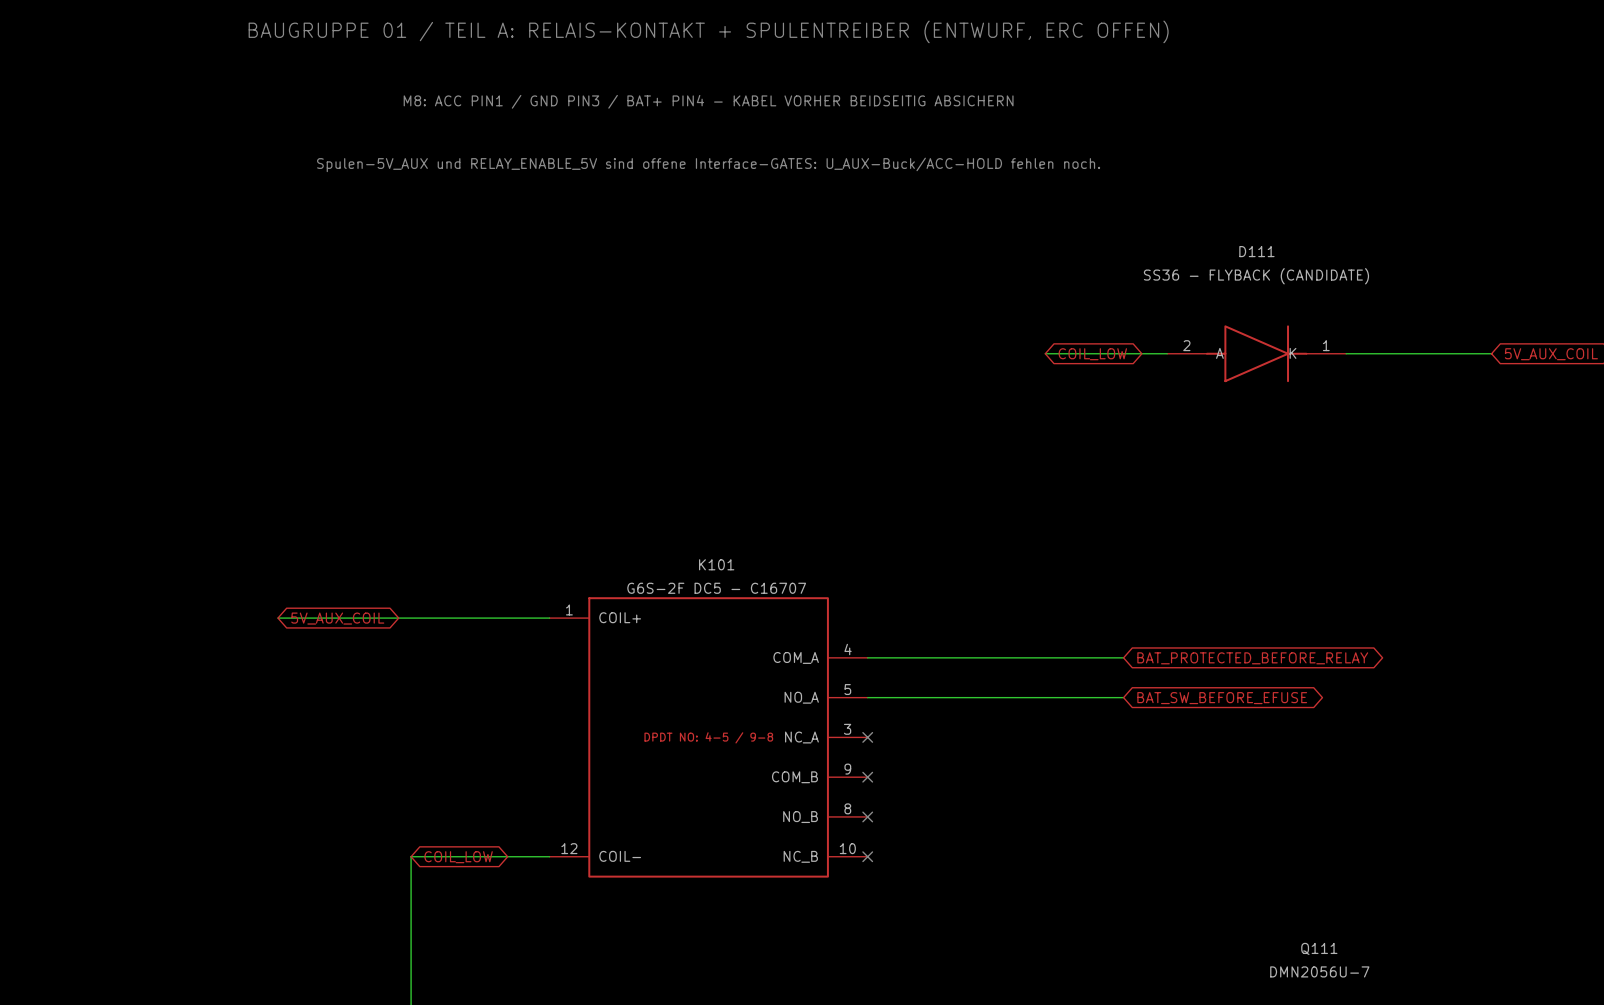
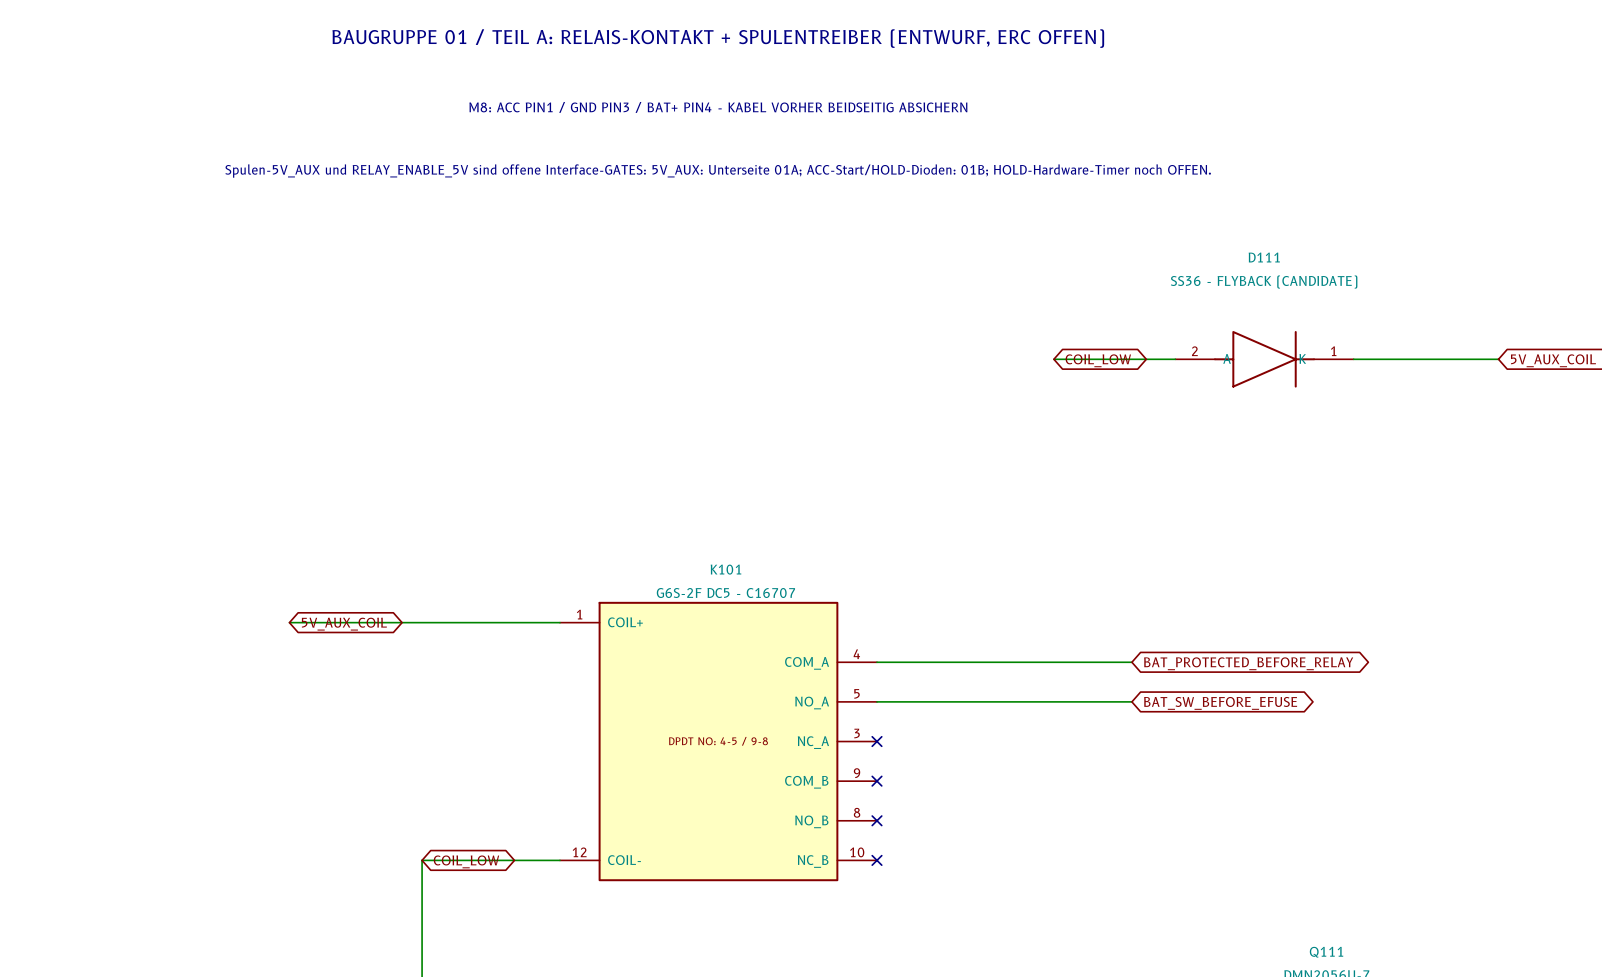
text: Spulen-5V_AUX und RELAY_ENABLE_5V sind offene Interface-GATES: U_AUX-Buck/ACC-HOLD fehlen noch. (708, 164) -> Spulen-5V_AUX und RELAY_ENABLE_5V sind offene Interface-GATES: 5V_AUX: Unterseite 01A; ACC-Start/HOLD-Dioden: 01B; HOLD-Hardware-Timer noch OFFEN. (718, 171)

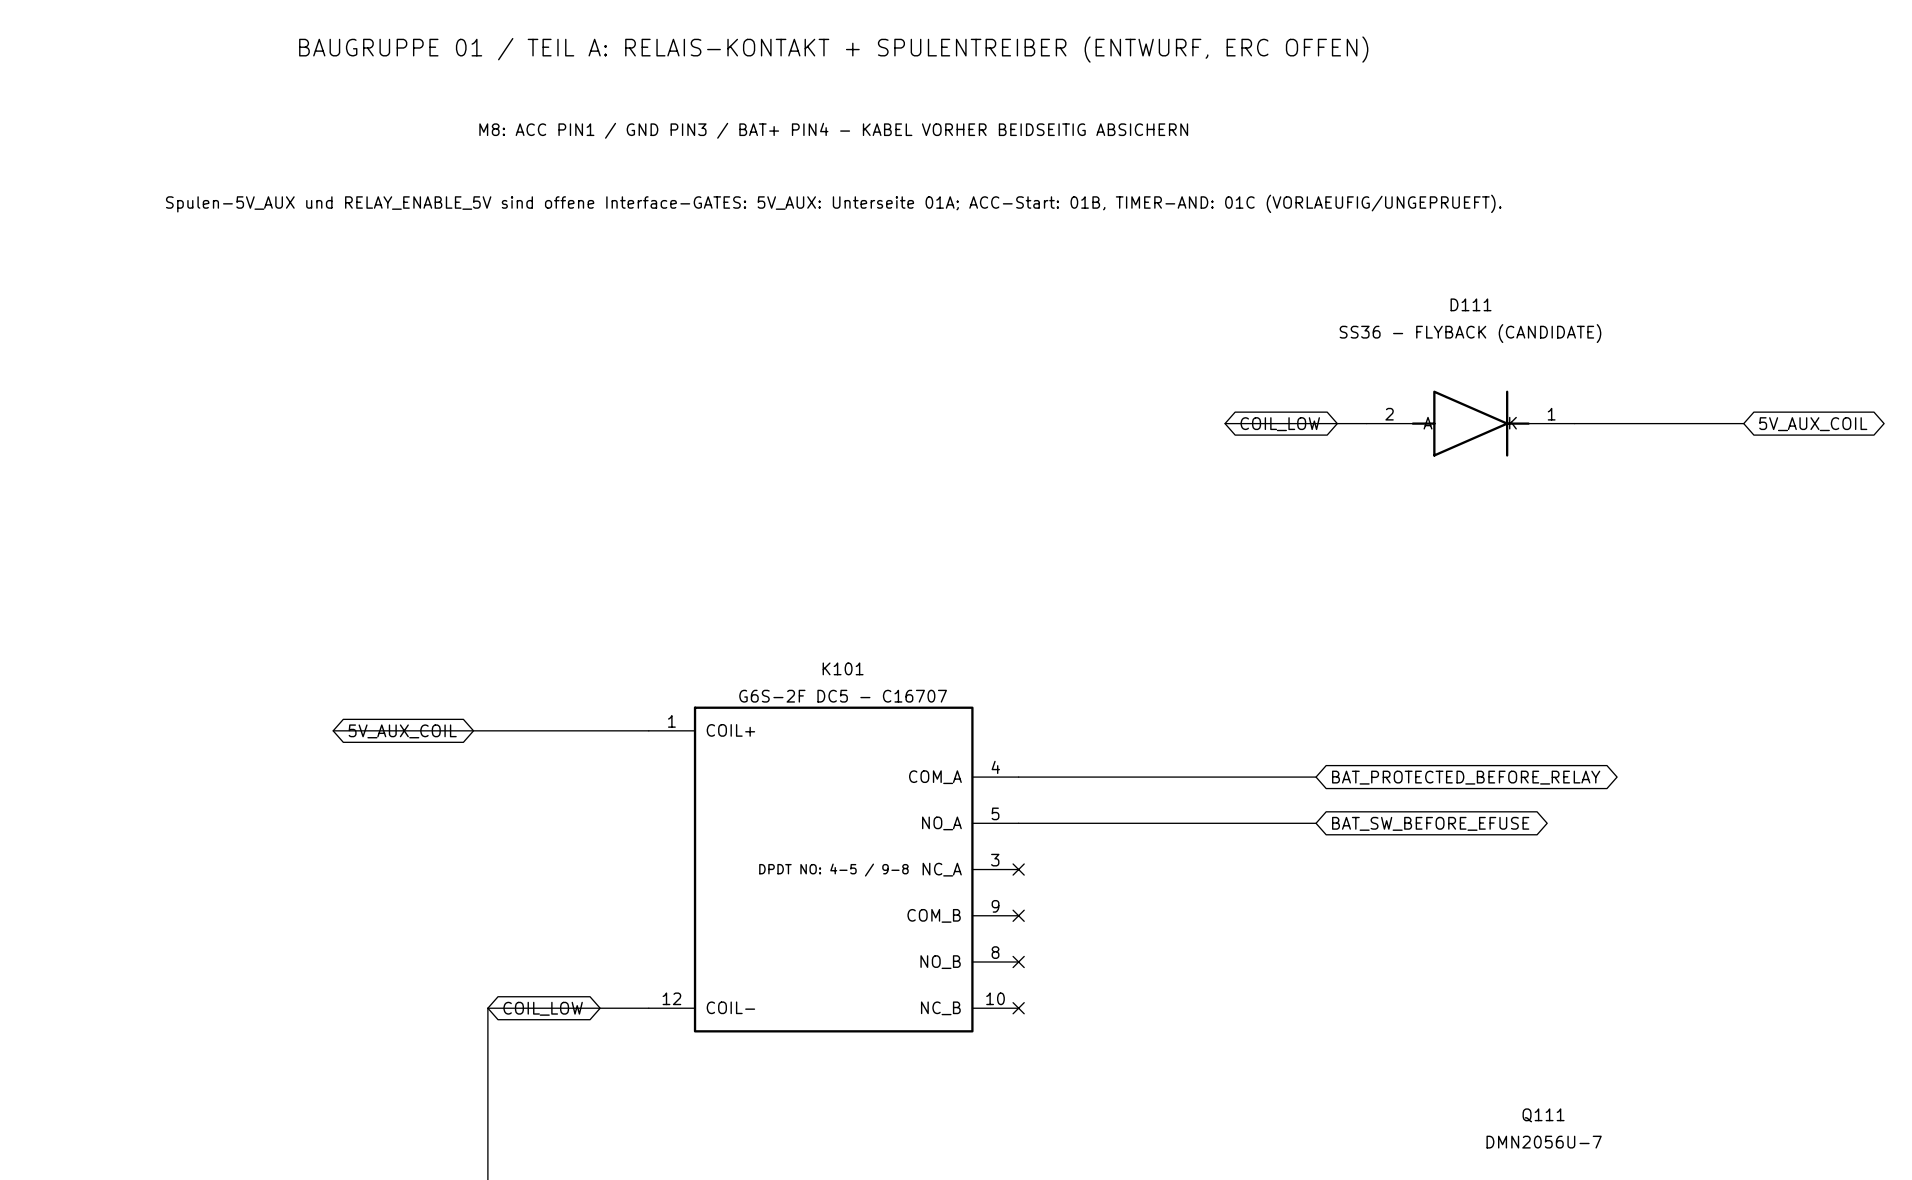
text: Spulen-5V_AUX und RELAY_ENABLE_5V sind offene Interface-GATES: 5V_AUX: Unterseite 01A; ACC-Start/HOLD-Dioden: 01B; HOLD-Hardware-Timer noch OFFEN. (718, 171) -> Spulen-5V_AUX und RELAY_ENABLE_5V sind offene Interface-GATES: 5V_AUX: Unterseite 01A; ACC-Start: 01B, TIMER-AND: 01C (VORLAEUFIG/UNGEPRUEFT). (833, 203)

